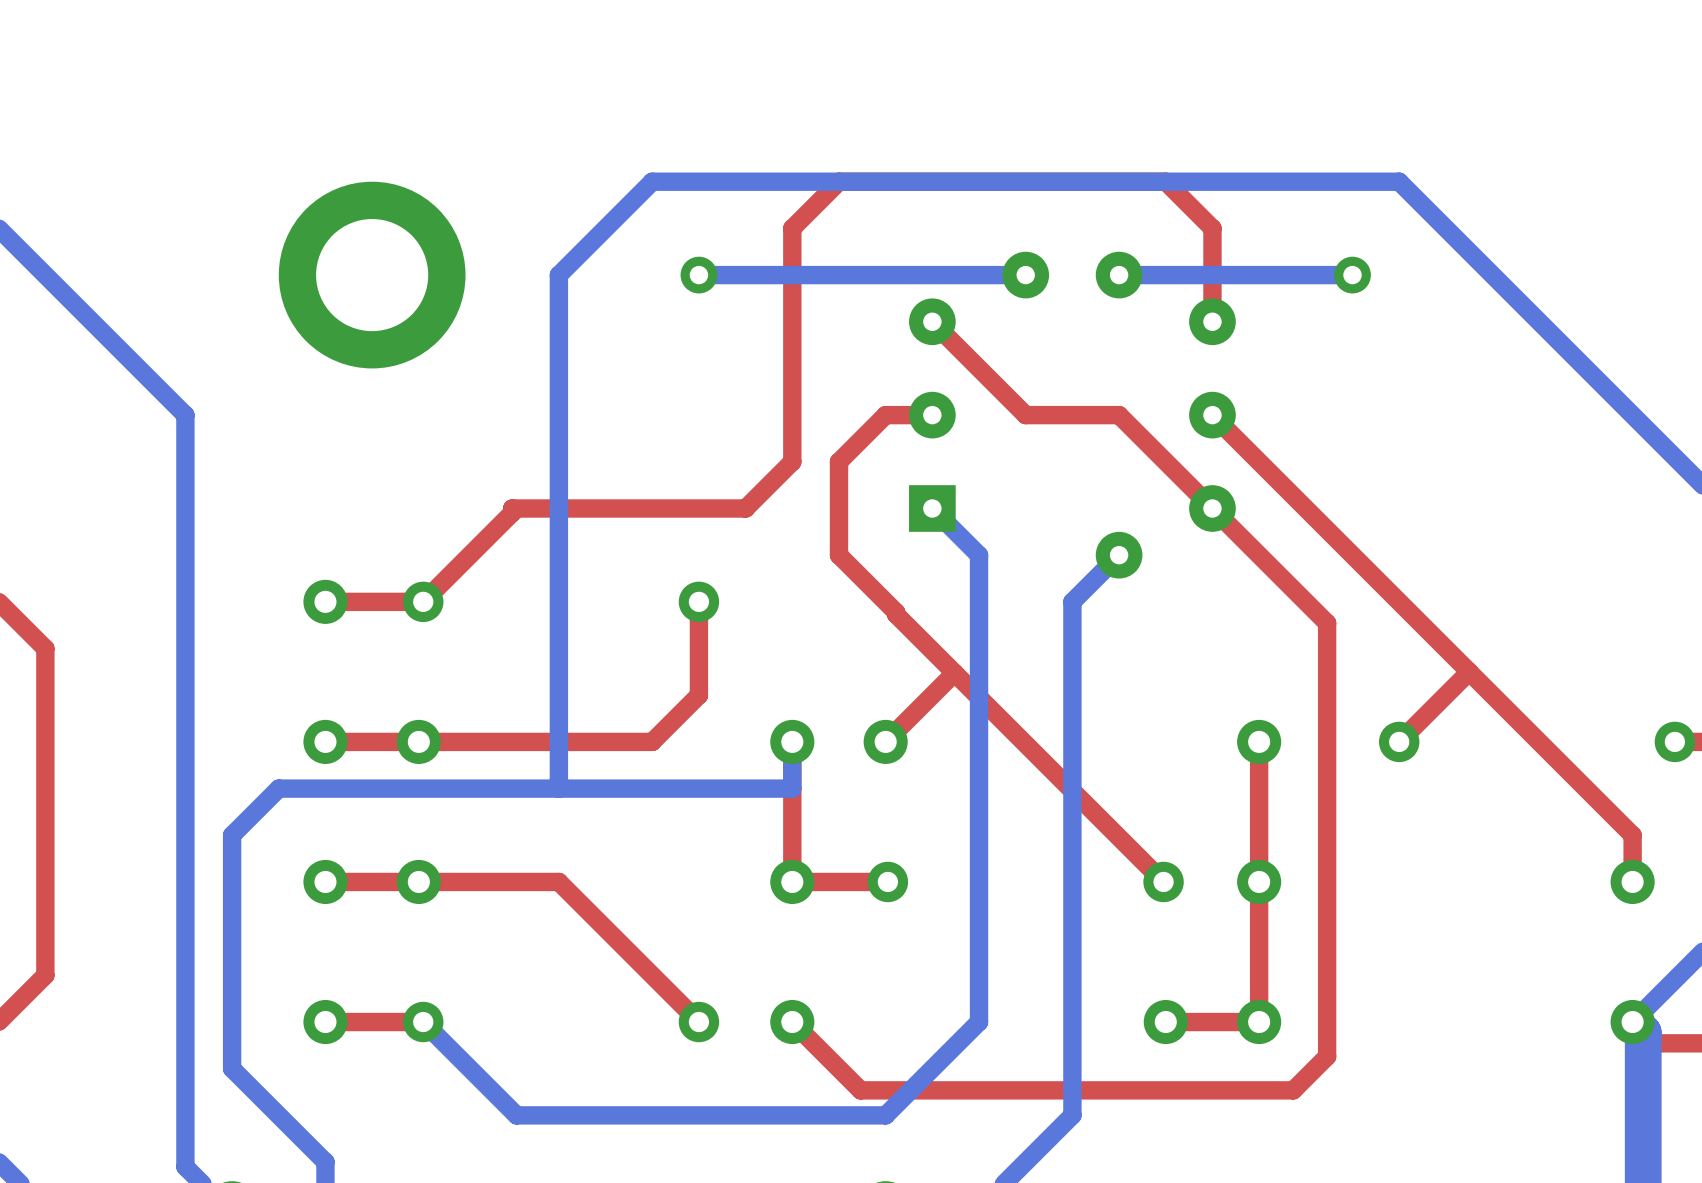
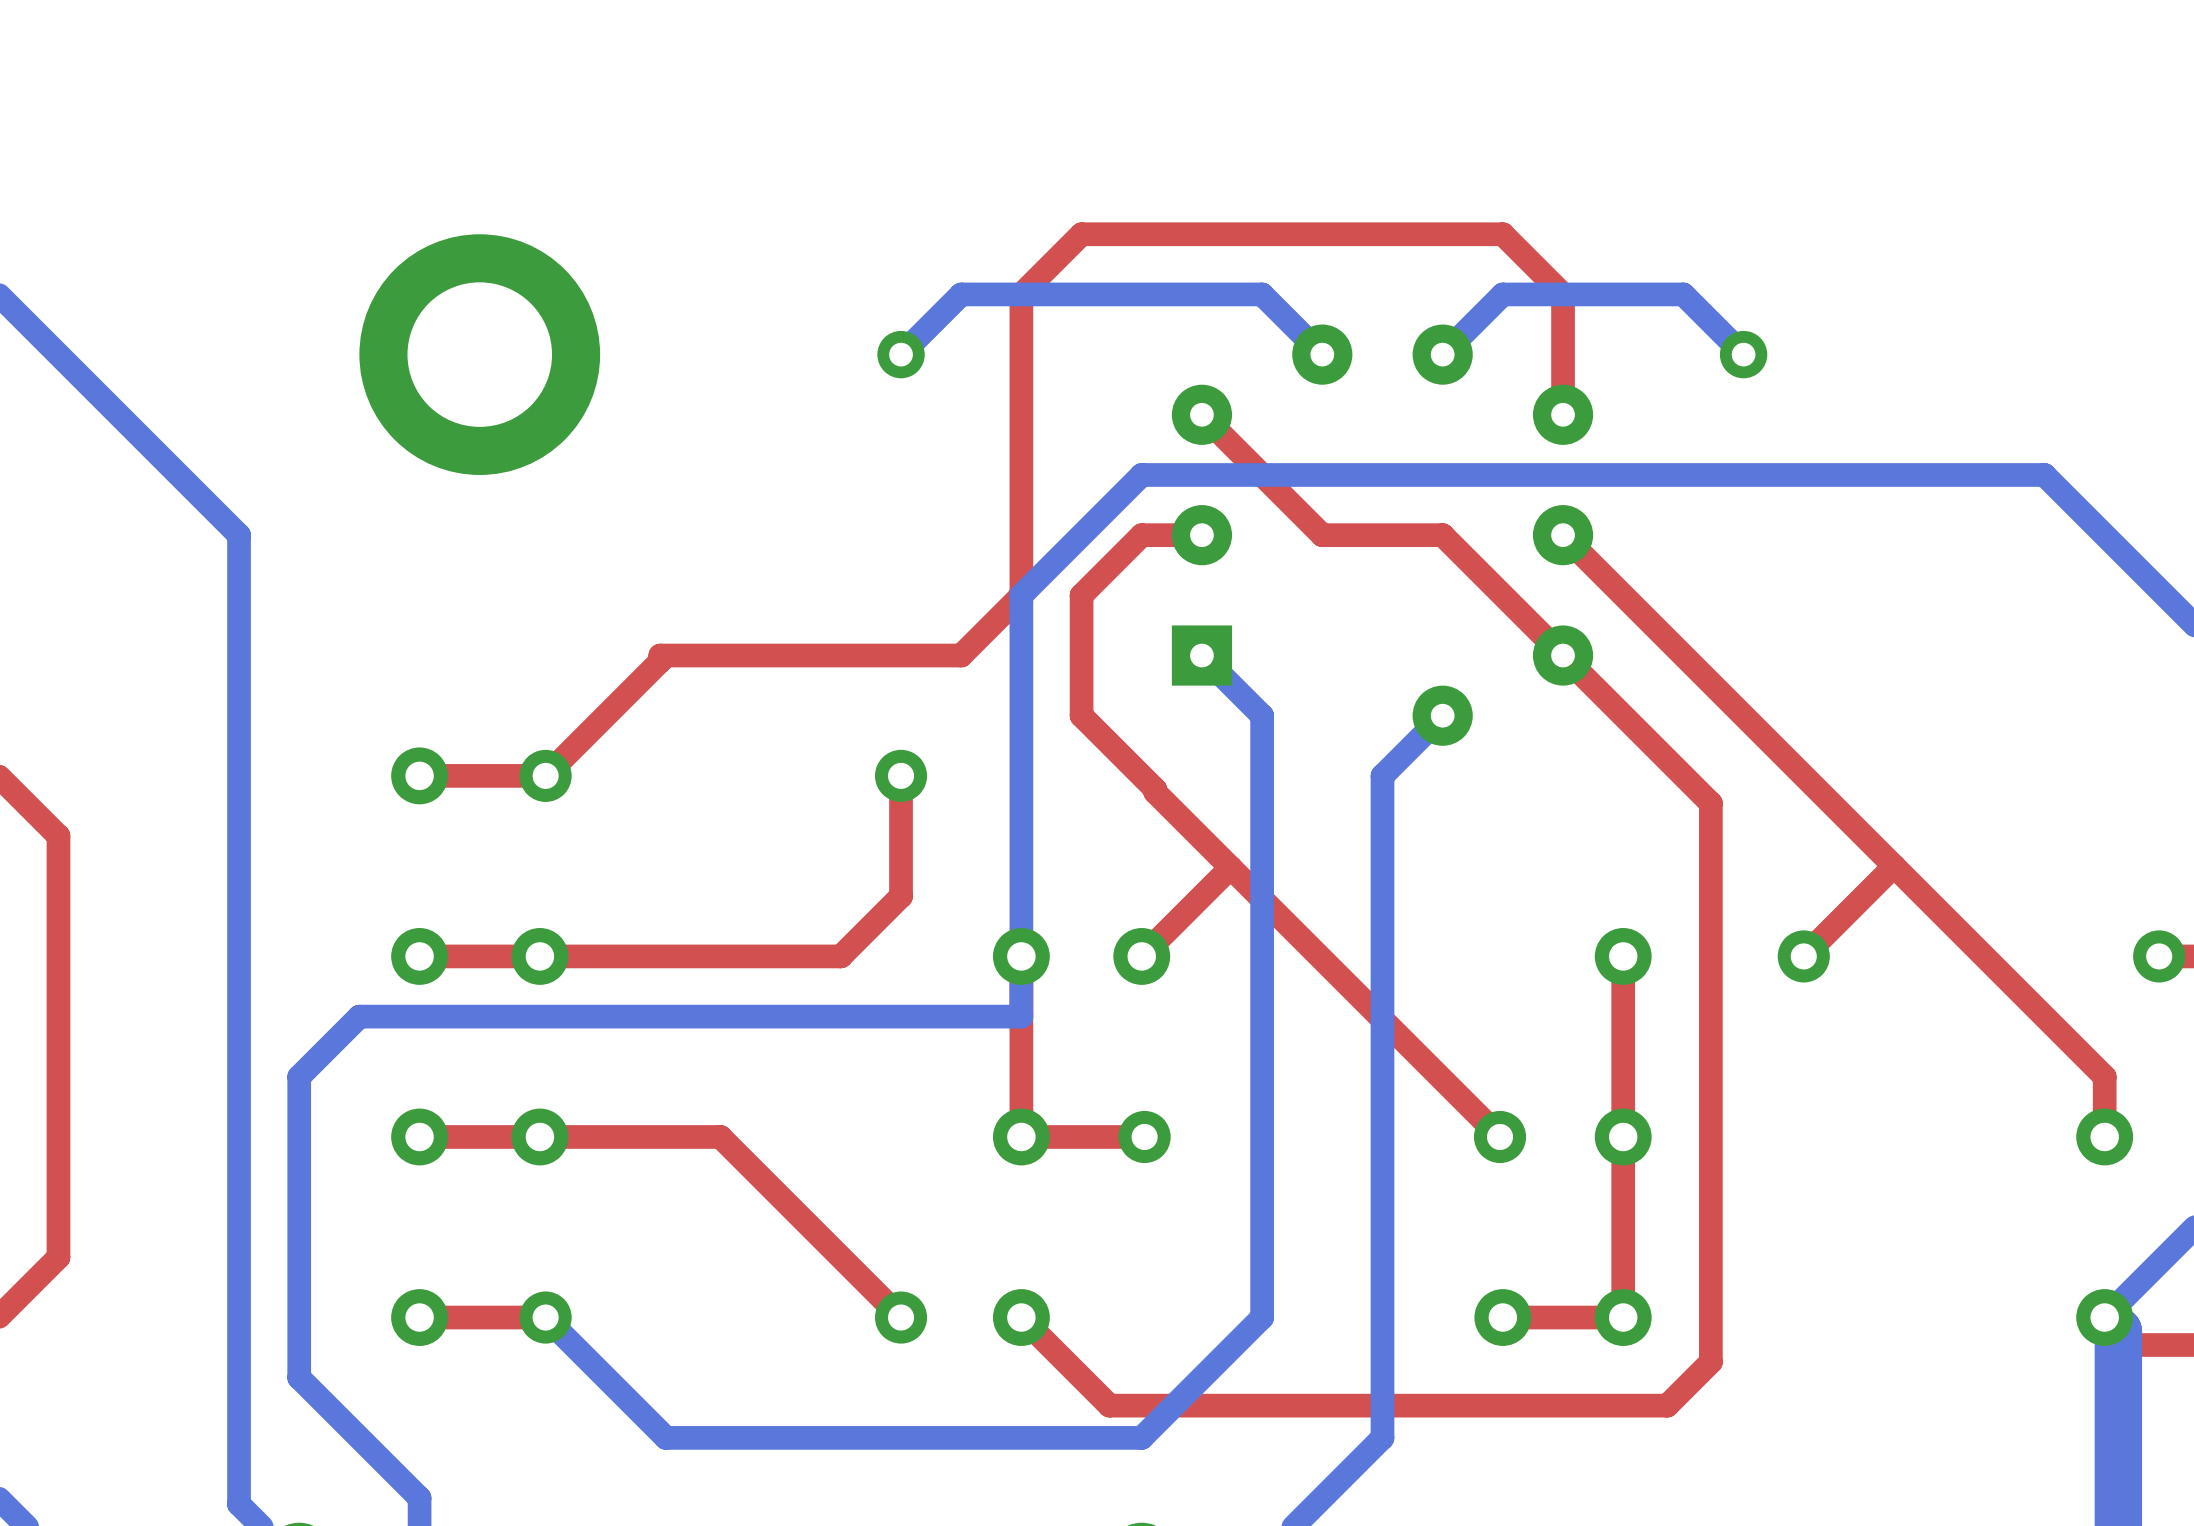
bottom track: (1025, 275) (698, 275) -> (1322, 354) (1262, 294) (961, 294) (901, 354)
bottom track: (1352, 275) (1119, 275) -> (1743, 354) (1683, 294) (1502, 294) (1442, 354)
bottom track: (1585, 368) (1399, 181) (652, 181) (558, 275) (558, 788) -> (2044, 474) (1141, 474) (1021, 595) (1021, 956)

